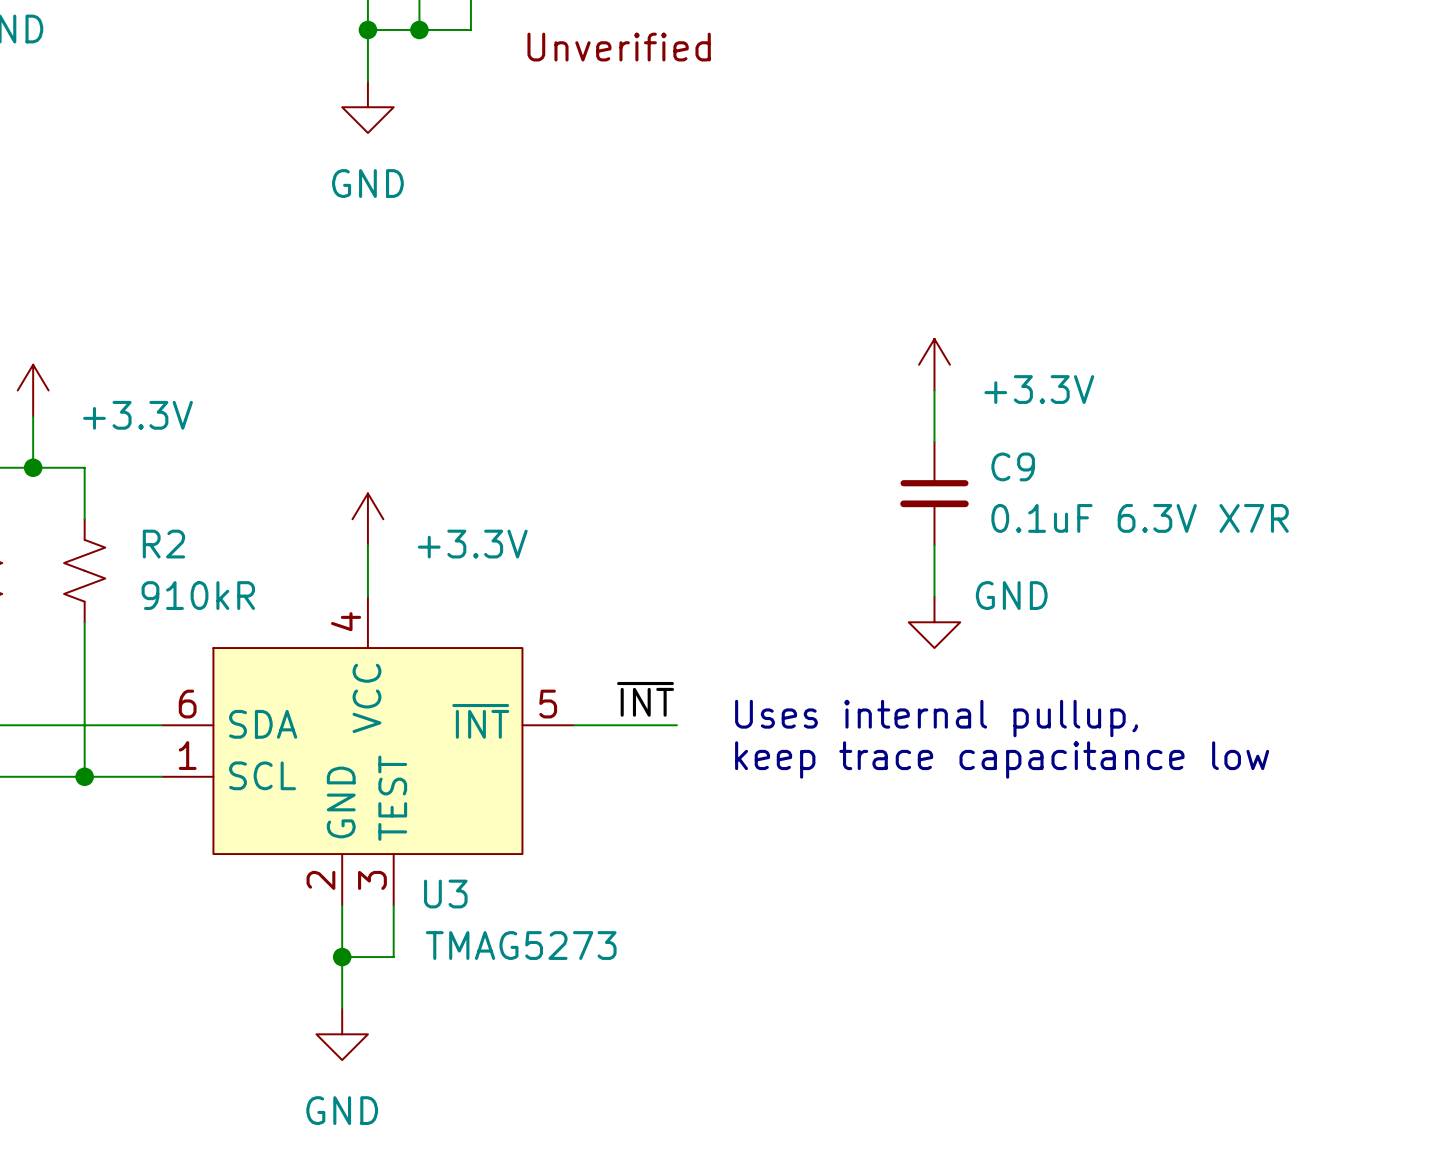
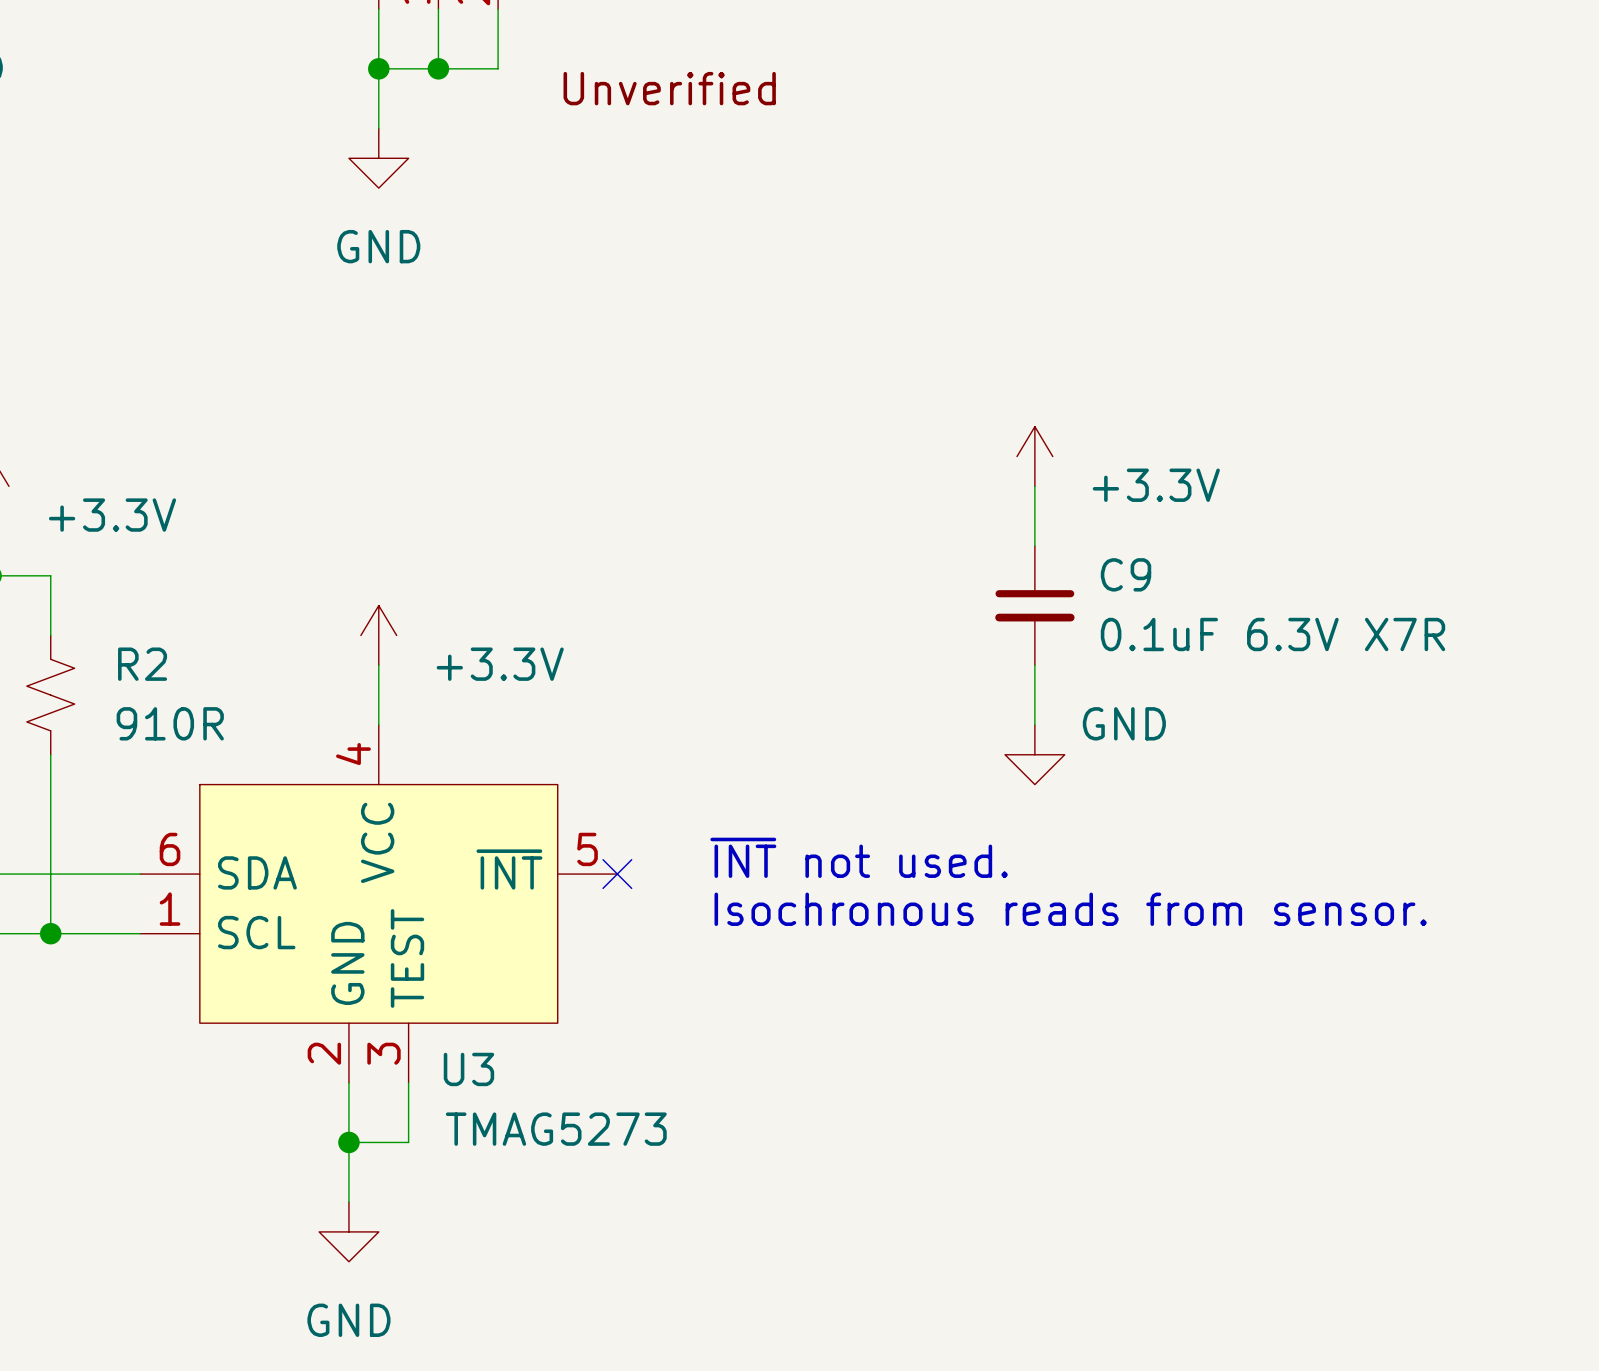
R2 value: 910kR (198, 595) -> 910R (170, 723)
label: ~{INT} (645, 699) -> none
text: none -> ~{INT} not used. (859, 857)
text: Uses internal pullup, (936, 718) -> none
wire: (573, 725) (676, 725) -> none
no-connect mark: none -> (617, 874)
text: none -> Isochronous reads from sensor. (1070, 909)
text: keep trace capacitance low (1002, 759) -> none

